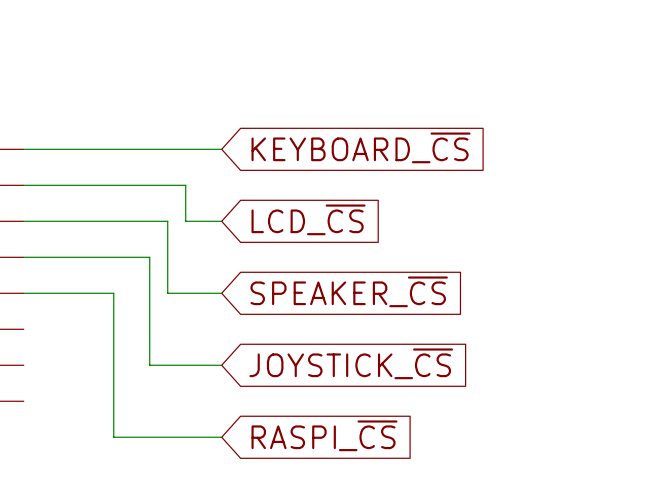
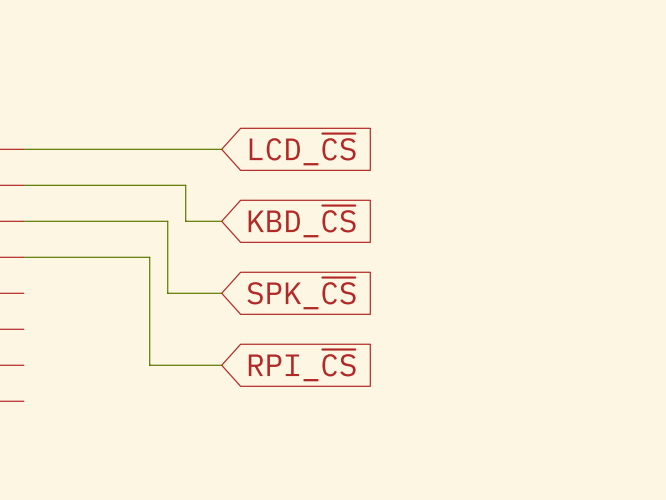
global label: KEYBOARD_~{CS} (360, 147) -> LCD_~{CS} (302, 149)
global label: LCD_~{CS} (308, 219) -> KBD_~{CS} (302, 221)
global label: SPEAKER_~{CS} (349, 291) -> SPK_~{CS} (301, 293)
wire: (23, 293) (113, 293) (113, 437) (221, 437) -> none
global label: JOYSTICK_~{CS} (351, 363) -> RPI_~{CS} (302, 365)
global label: RASPI_~{CS} (324, 435) -> none

